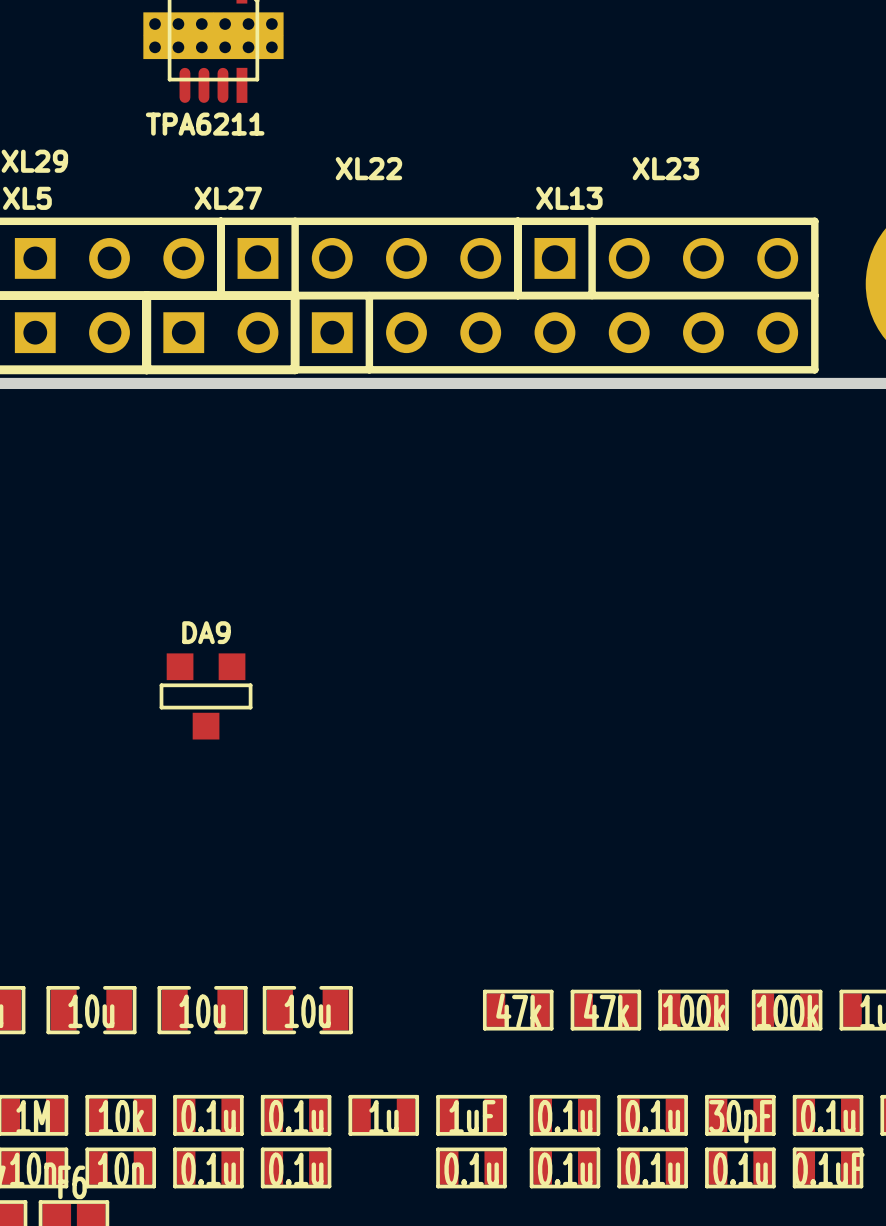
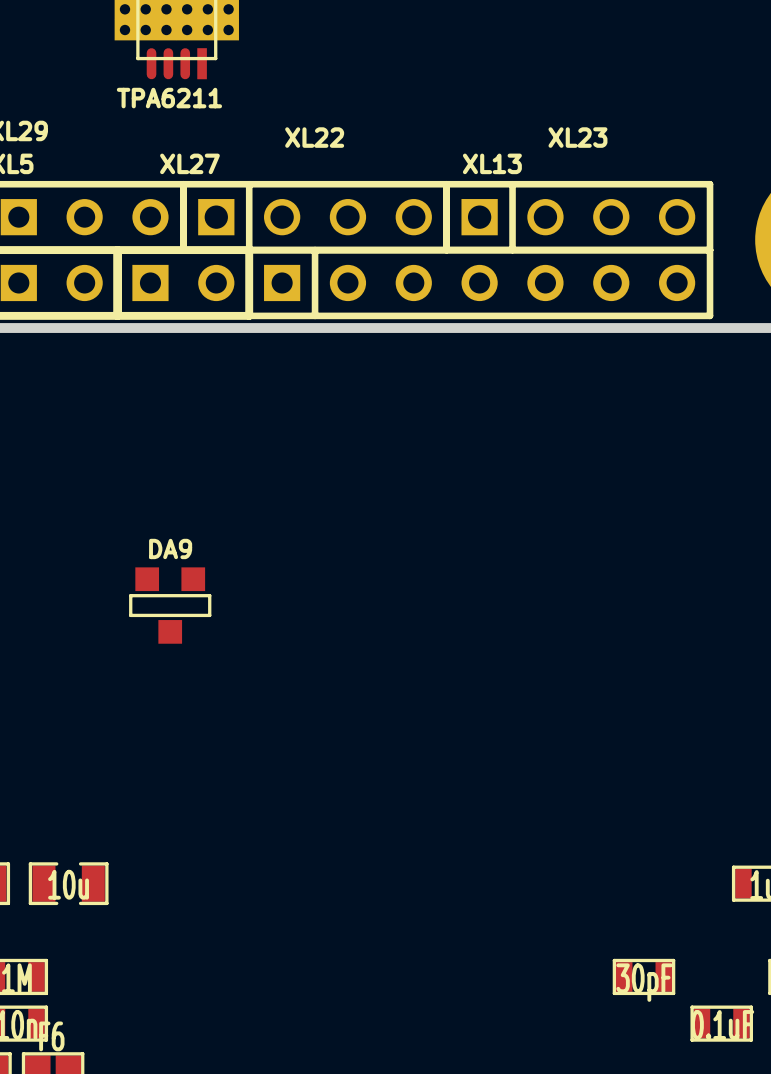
part: 10u (202, 1010) -> none
part: 10u (307, 1010) -> none
part: 47k (518, 1010) -> none
part: 47k (605, 1010) -> none
part: 100k (693, 1010) -> none
part: 100k (787, 1010) -> none
part: 10k (120, 1115) -> none
part: 0.1u (208, 1115) -> none
part: 0.1u (296, 1115) -> none
part: 1u (383, 1115) -> none
part: 1uF (471, 1115) -> none
part: 0.1u (565, 1115) -> none
part: 0.1u (652, 1115) -> none
part: 0.1u (828, 1115) -> none
part: 10n (120, 1167) -> none
part: 0.1u (208, 1167) -> none
part: 0.1u (296, 1167) -> none
part: 0.1u (471, 1167) -> none
part: 0.1u (565, 1167) -> none
part: 0.1u (652, 1167) -> none
part: 0.1u (740, 1167) -> none

